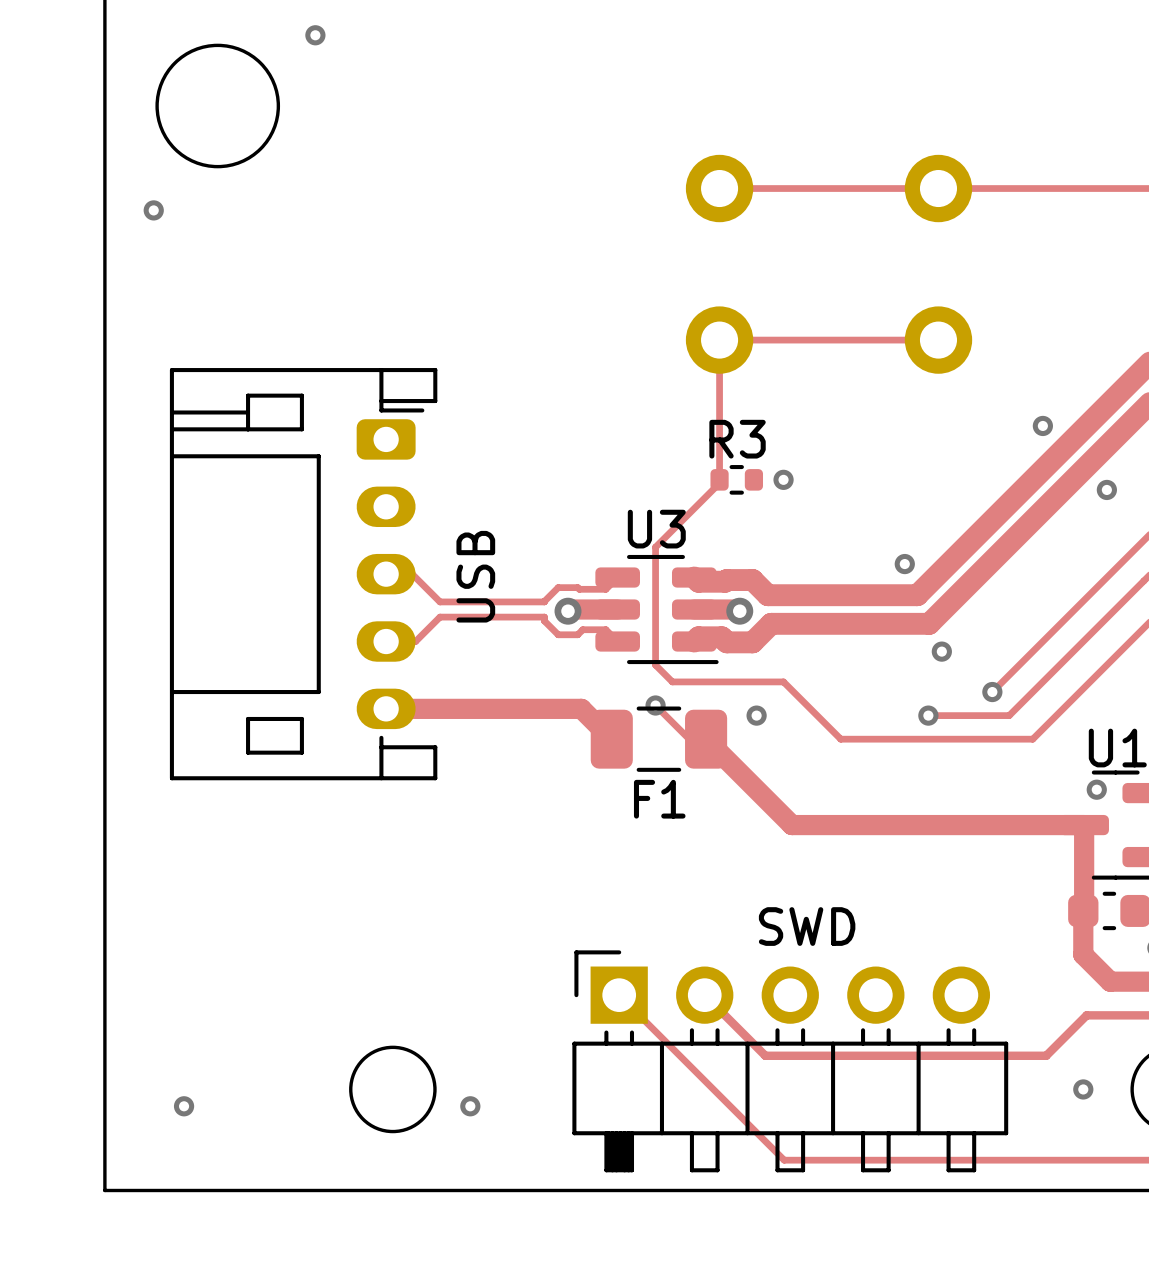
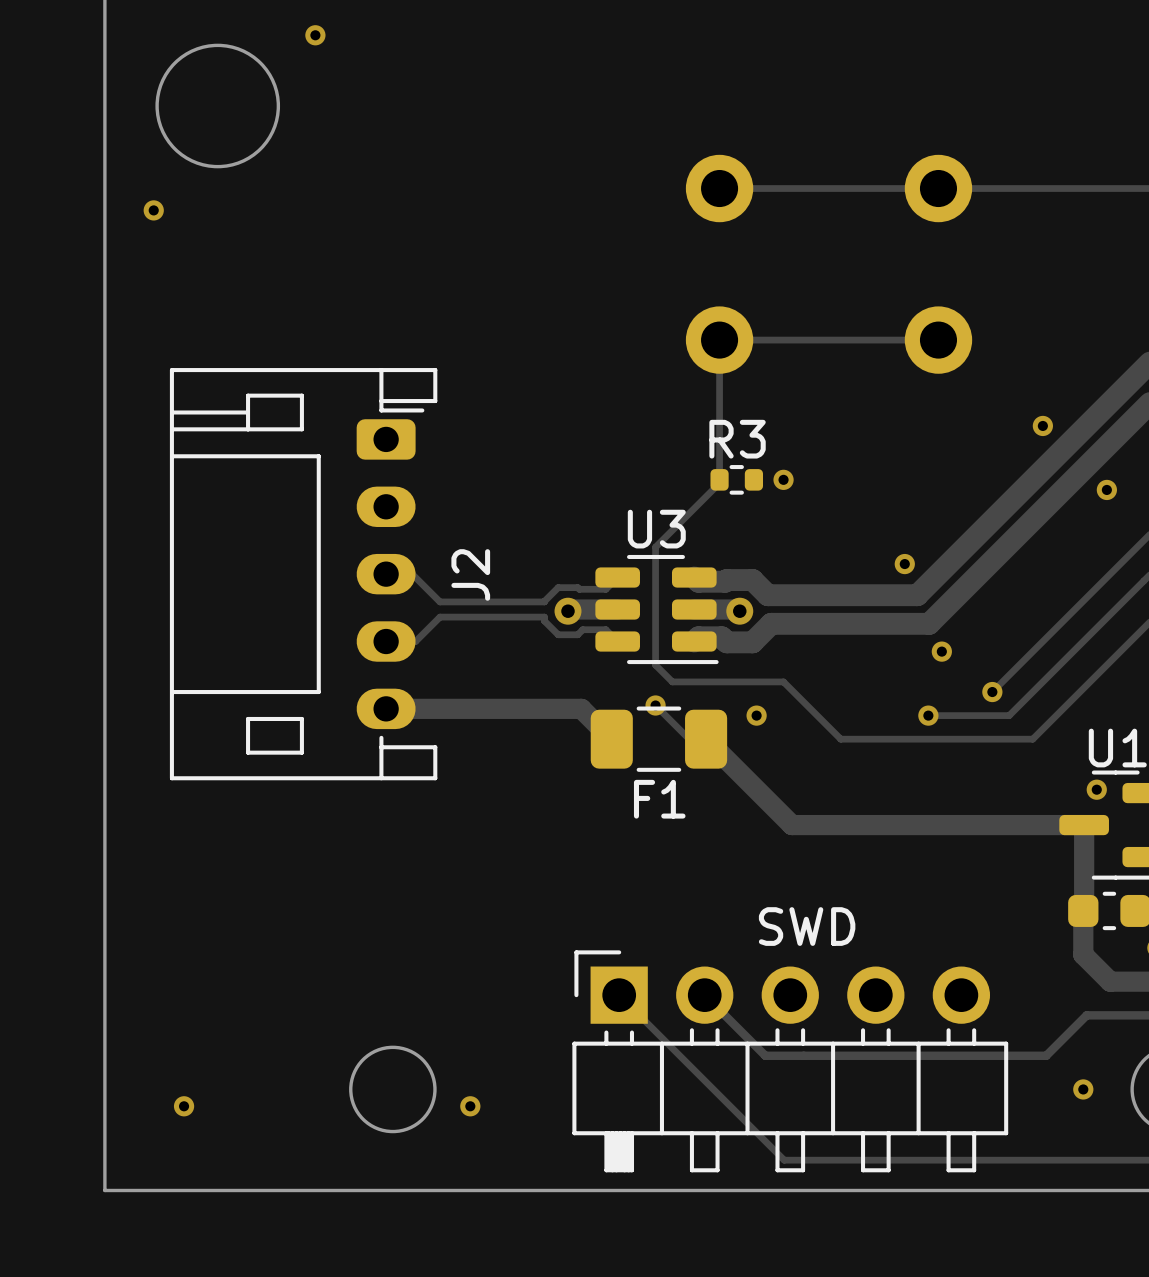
J2 name: none -> J2 (470, 574)
J2 value: USB (475, 576) -> none

